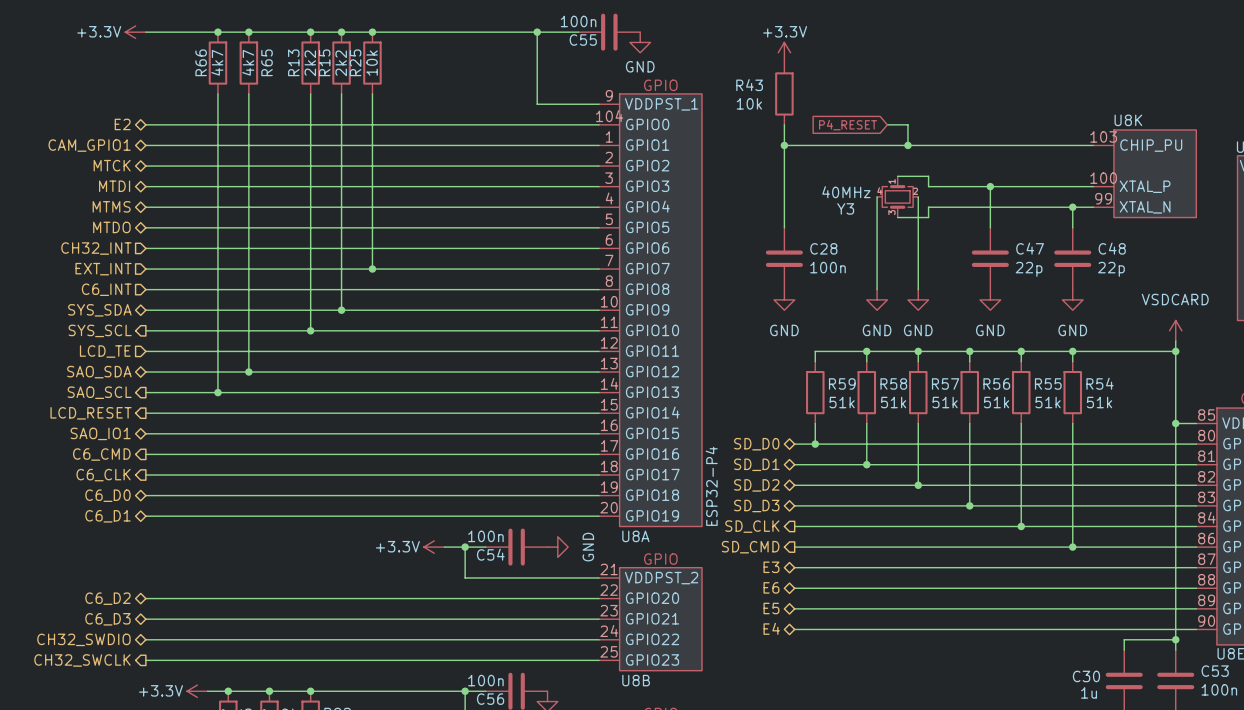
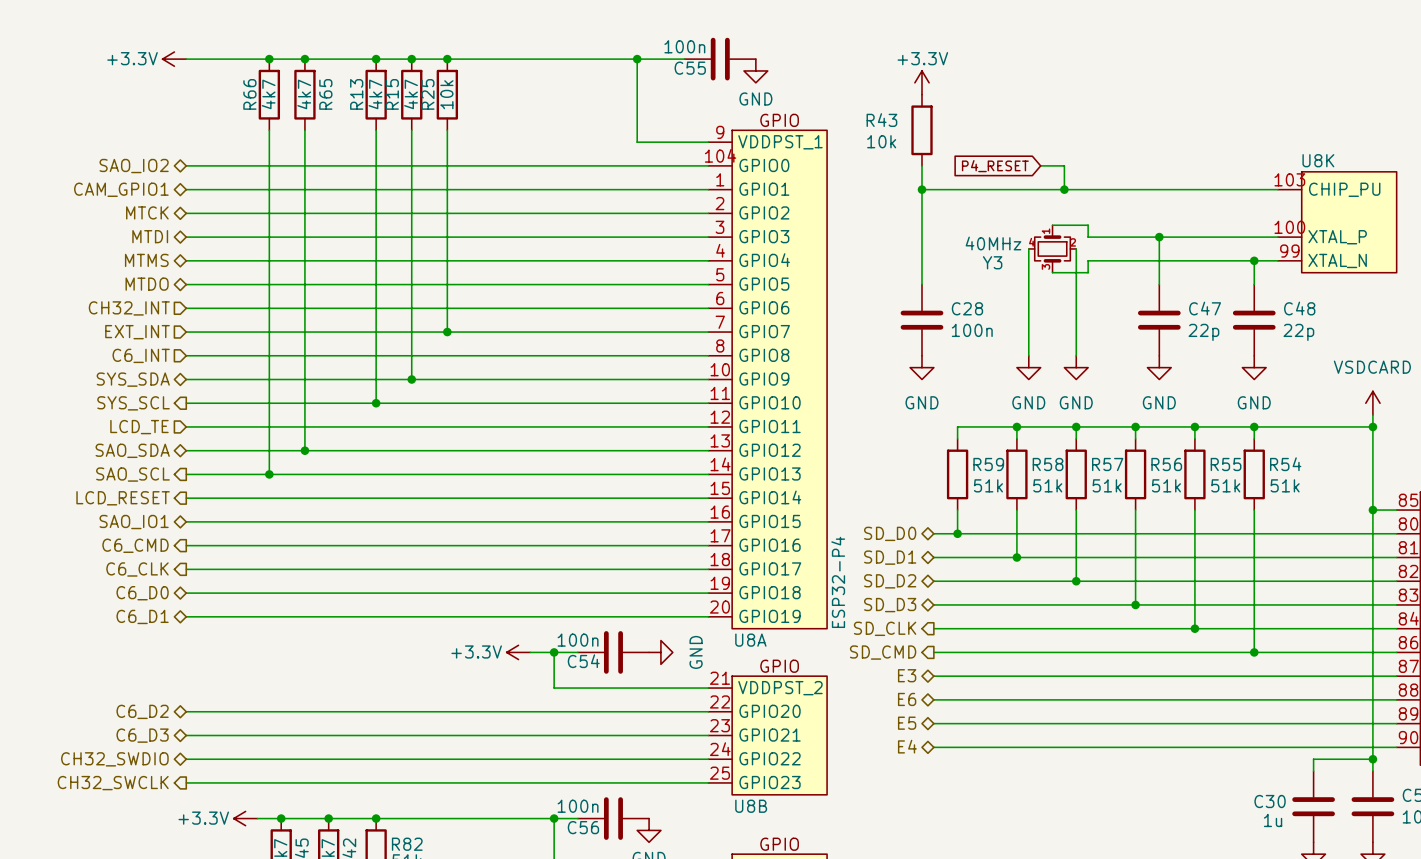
R13 value: 2k2 (310, 63) -> 4k7 (375, 94)
R15 value: 2k2 (341, 63) -> 4k7 (411, 94)
hierarchical label: E2 (122, 124) -> SAO_IO2 (134, 166)

